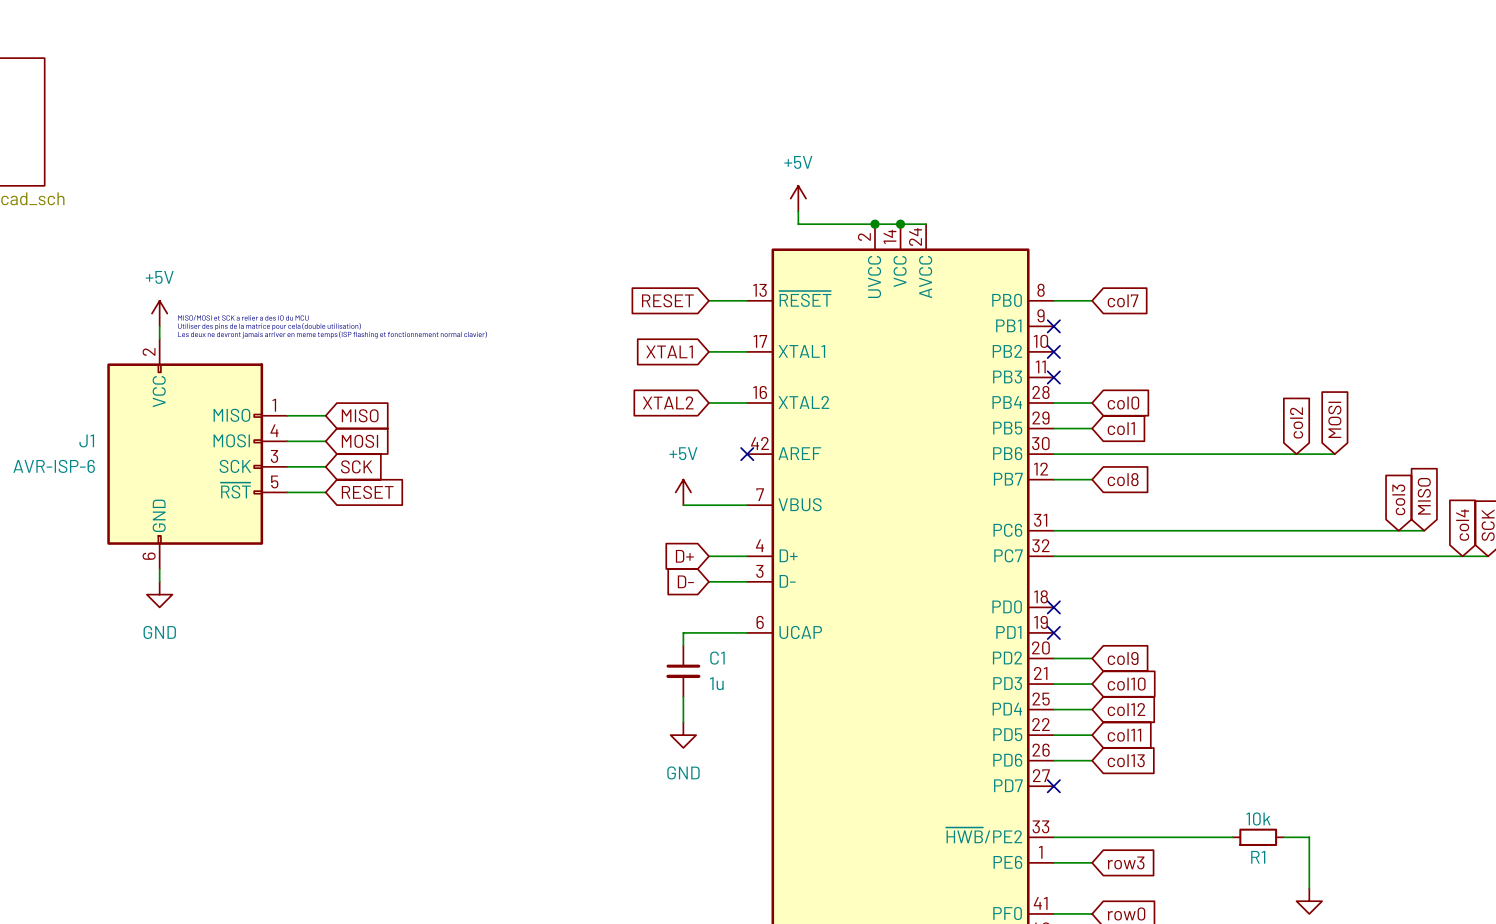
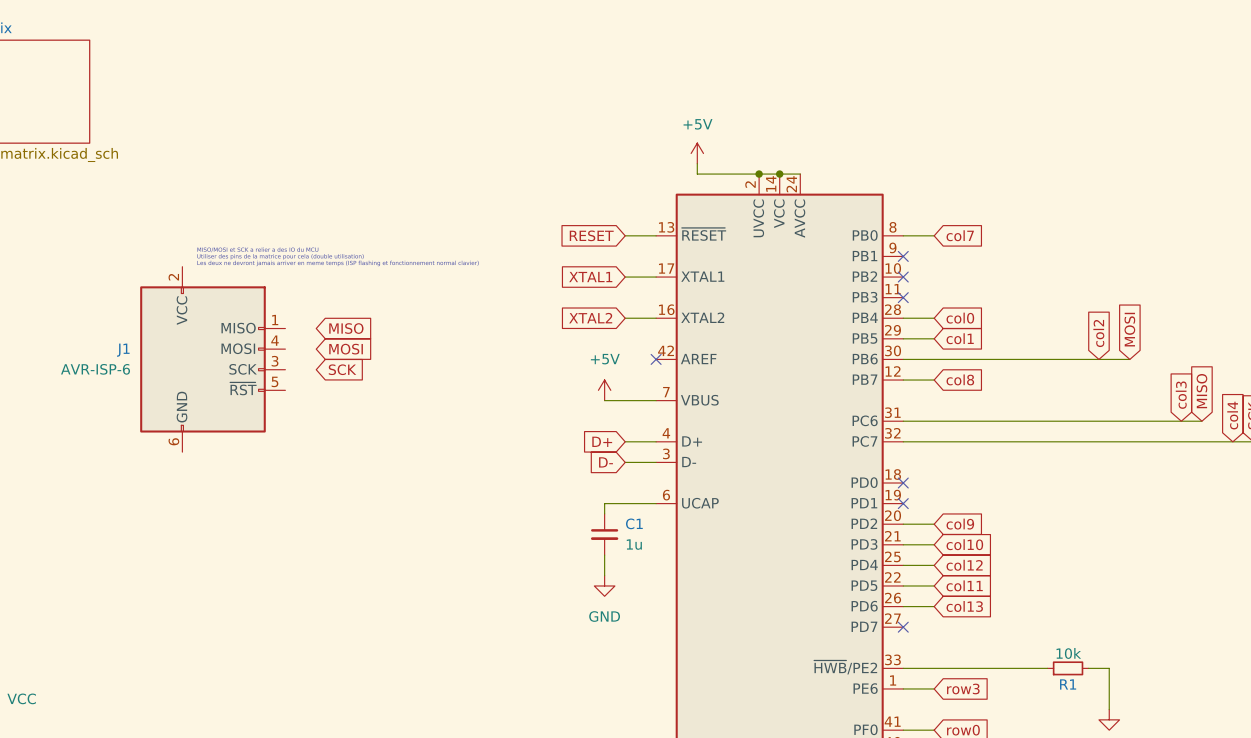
power symbol: +5V (159, 313) -> none
wire: (159, 326) (159, 339) -> none
wire: (287, 415) (325, 415) -> none
wire: (287, 441) (325, 441) -> none
wire: (287, 466) (325, 466) -> none
wire: (287, 492) (325, 492) -> none
global label: RESET (367, 492) -> none
wire: (159, 569) (159, 581) -> none
power symbol: GND (159, 594) -> none

